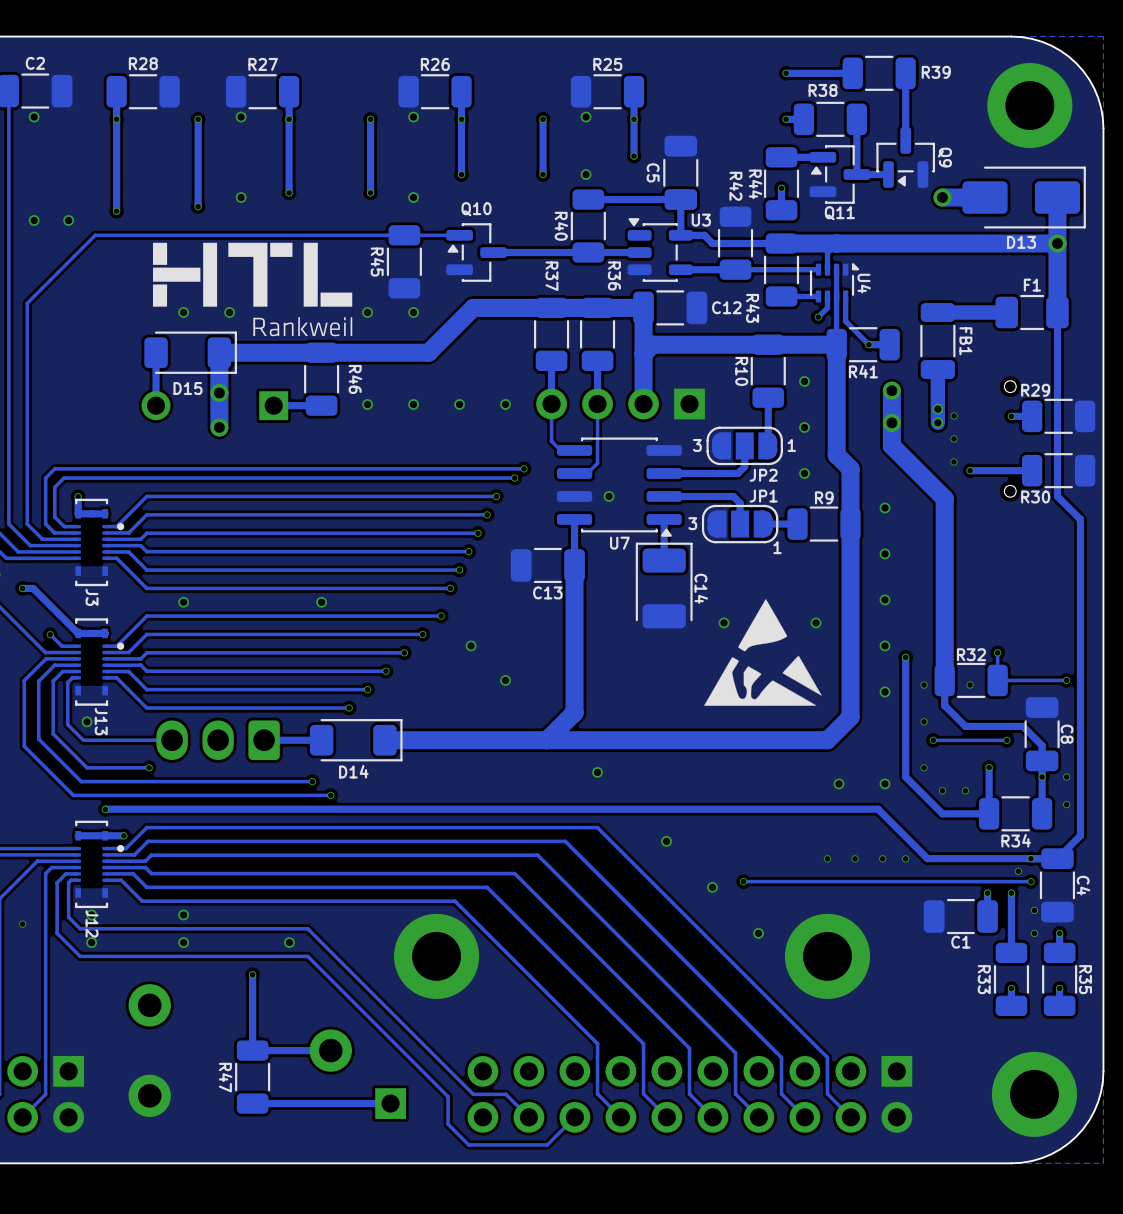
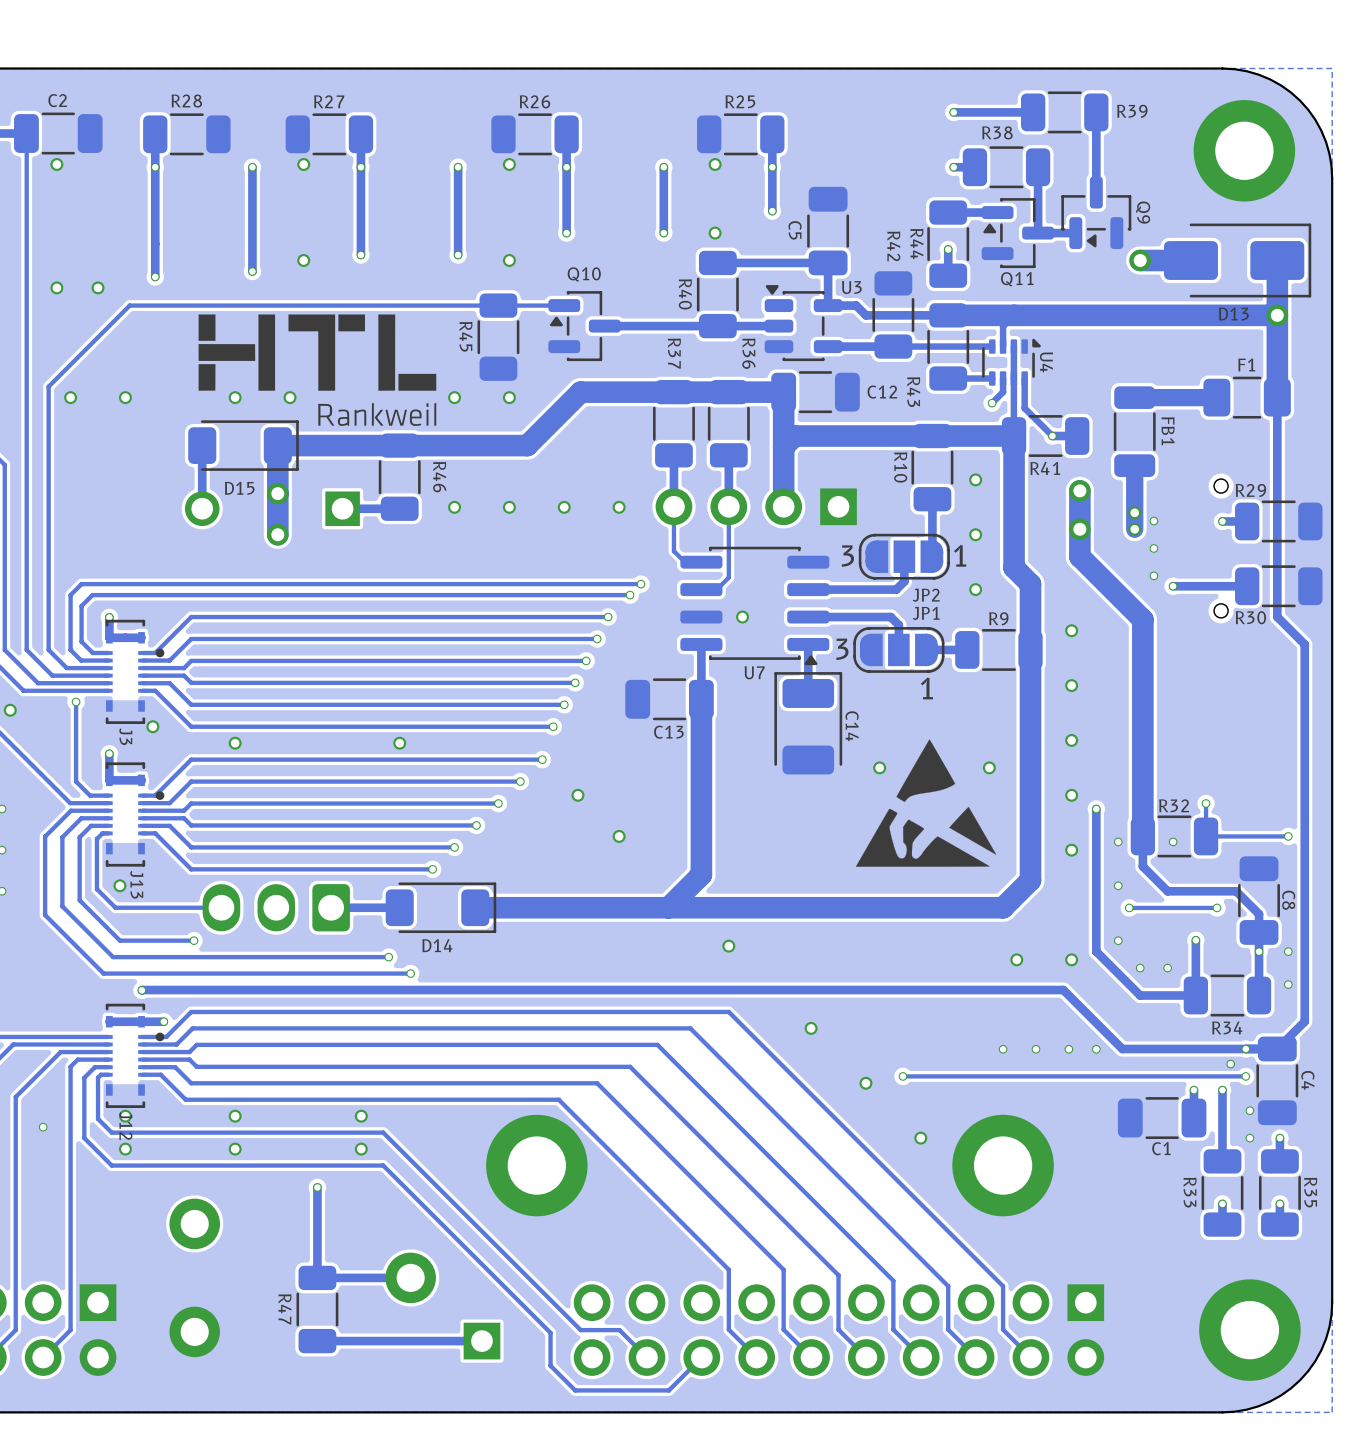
via: none -> (70, 397)
via: none -> (125, 397)
JP2 footprint: [706, 426, 783, 466] -> [858, 533, 950, 580]
JP1 footprint: [701, 504, 779, 544] -> [853, 627, 945, 673]
track: none -> (76, 701) (76, 781)
via: none -> (76, 701)
track: (22, 588) (33, 588) (78, 633) -> (109, 753) (109, 780)
via: (22, 588) -> none
via: none -> (152, 726)
via: none -> (109, 753)
via: (50, 634) -> none
via: none -> (361, 1116)

